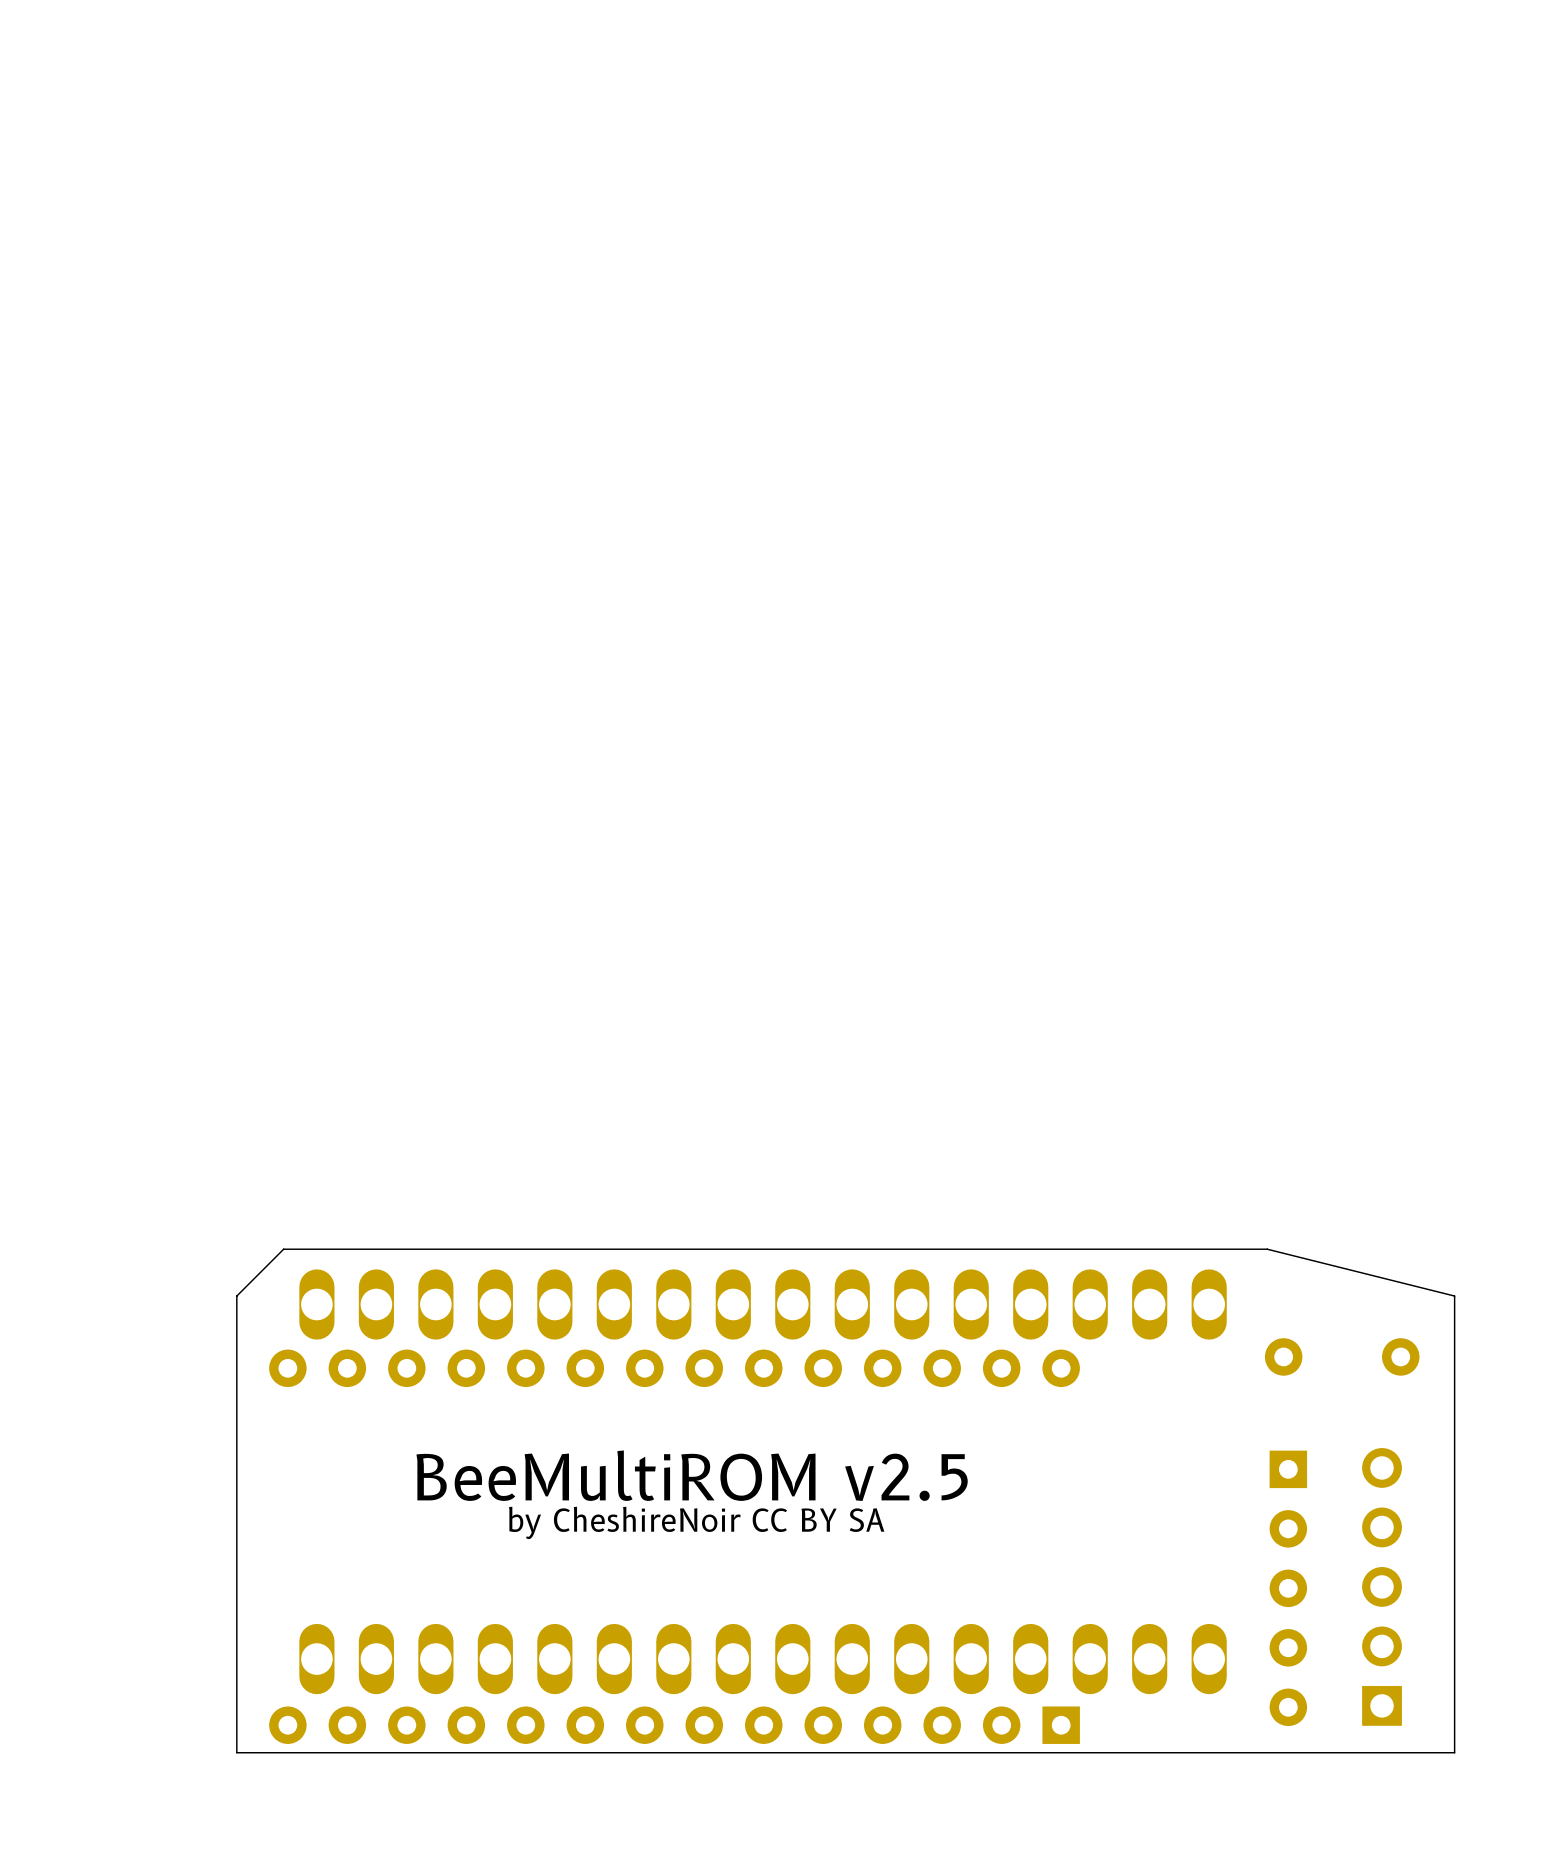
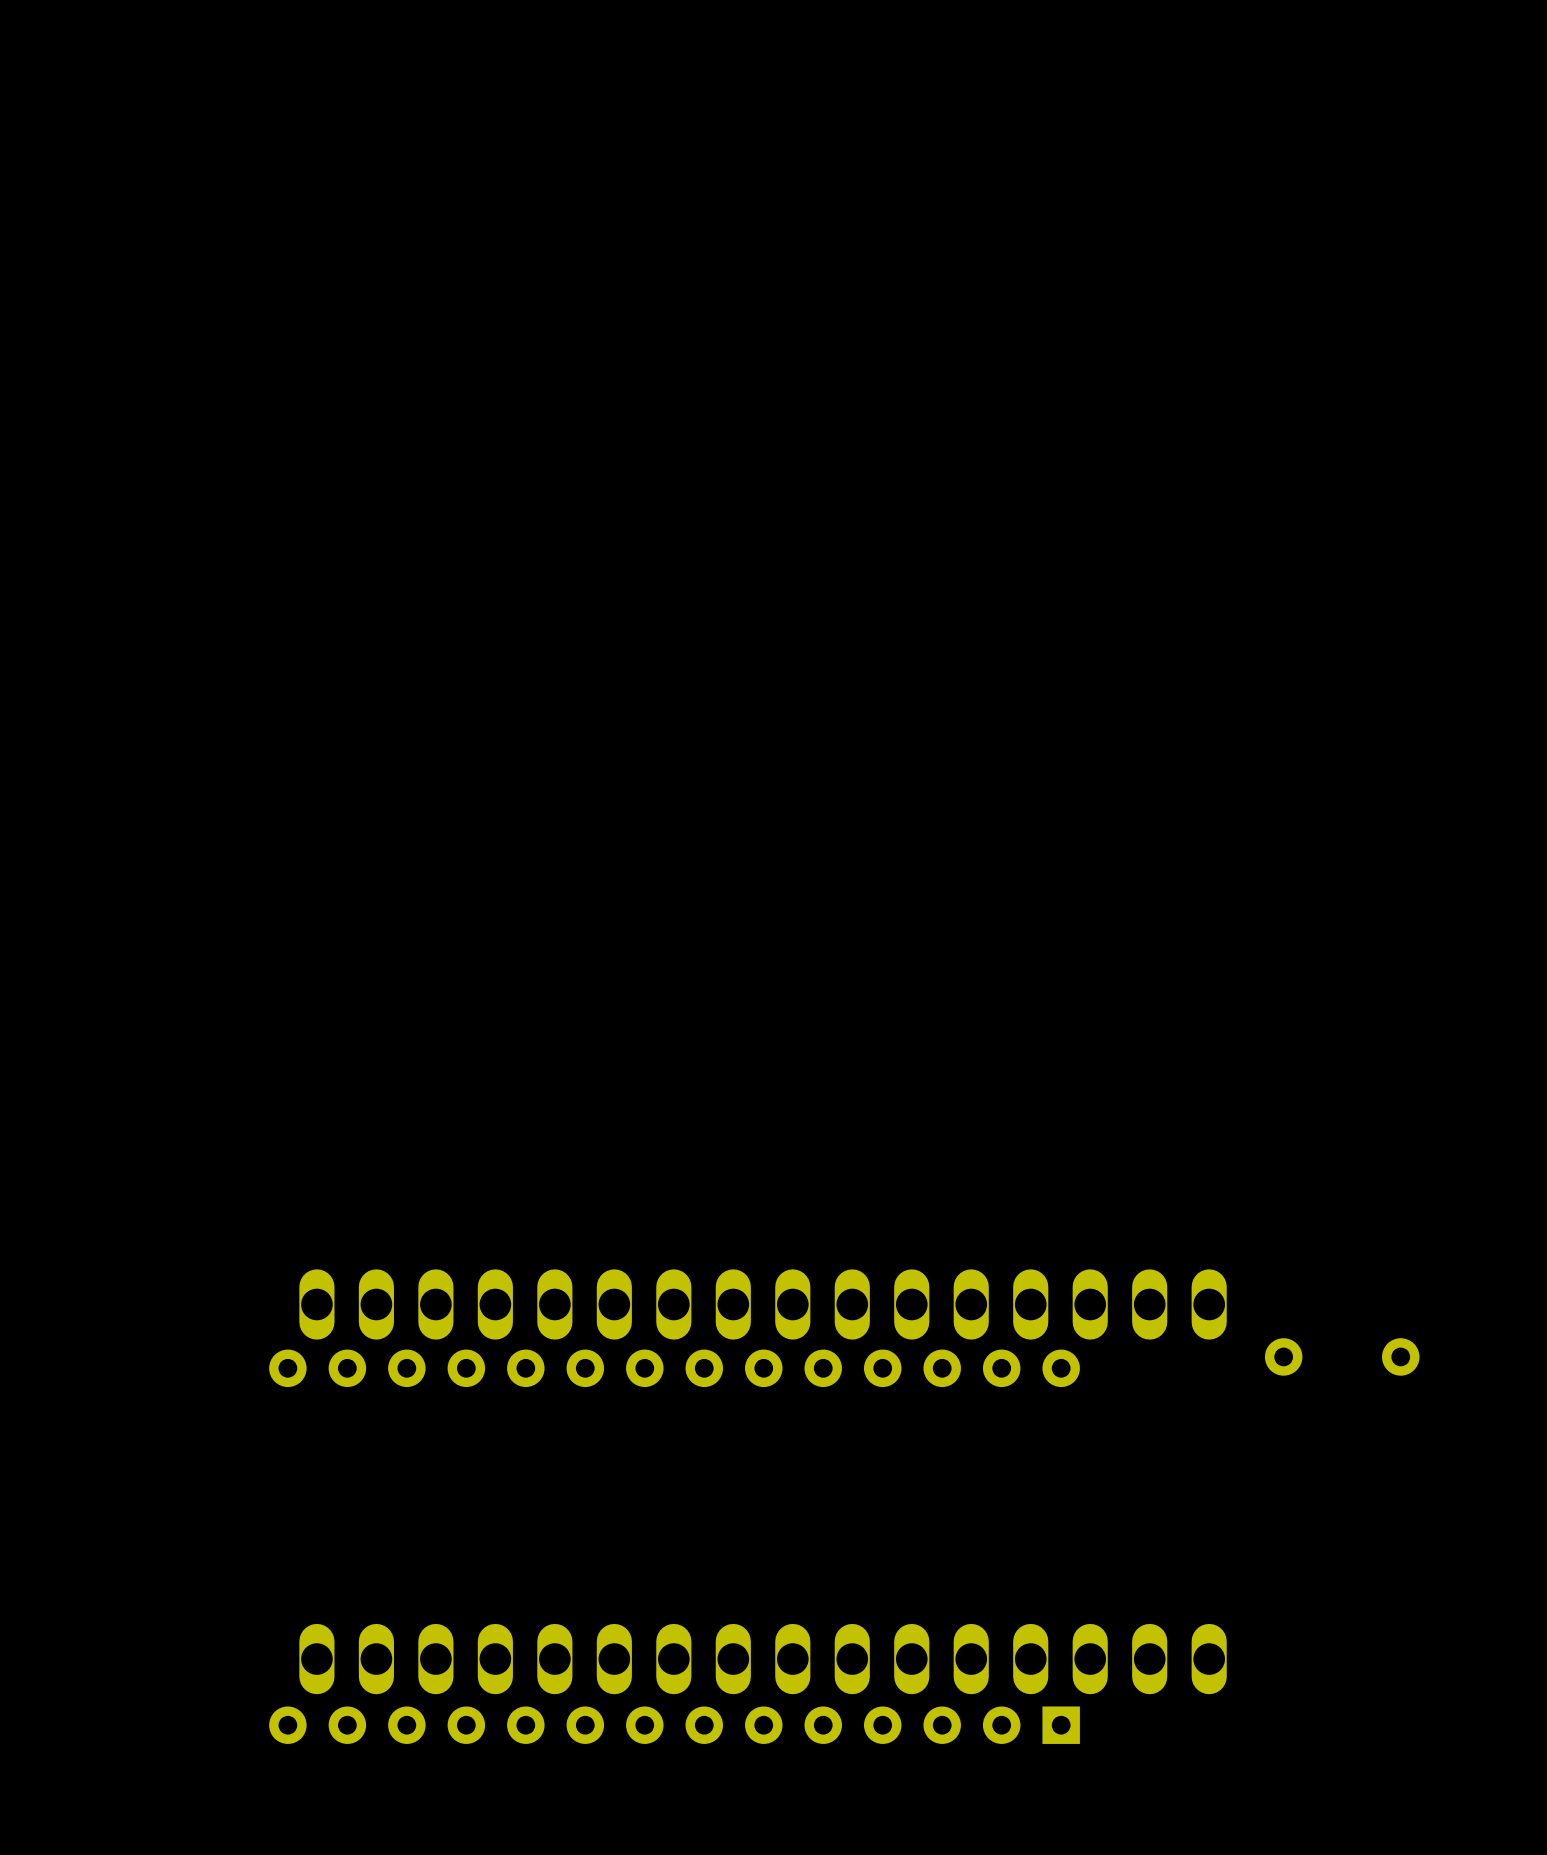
board edge: (1267, 1249) (1454, 1296) (1454, 1752) (236, 1752) (236, 1296) (283, 1249) (1267, 1249) -> none
text: BeeMultiROM v2.5 (692, 1475) -> none
text: by CheshireNoir CC BY SA (696, 1522) -> none
part: (1382, 1586) -> none
part: (1288, 1588) -> none

